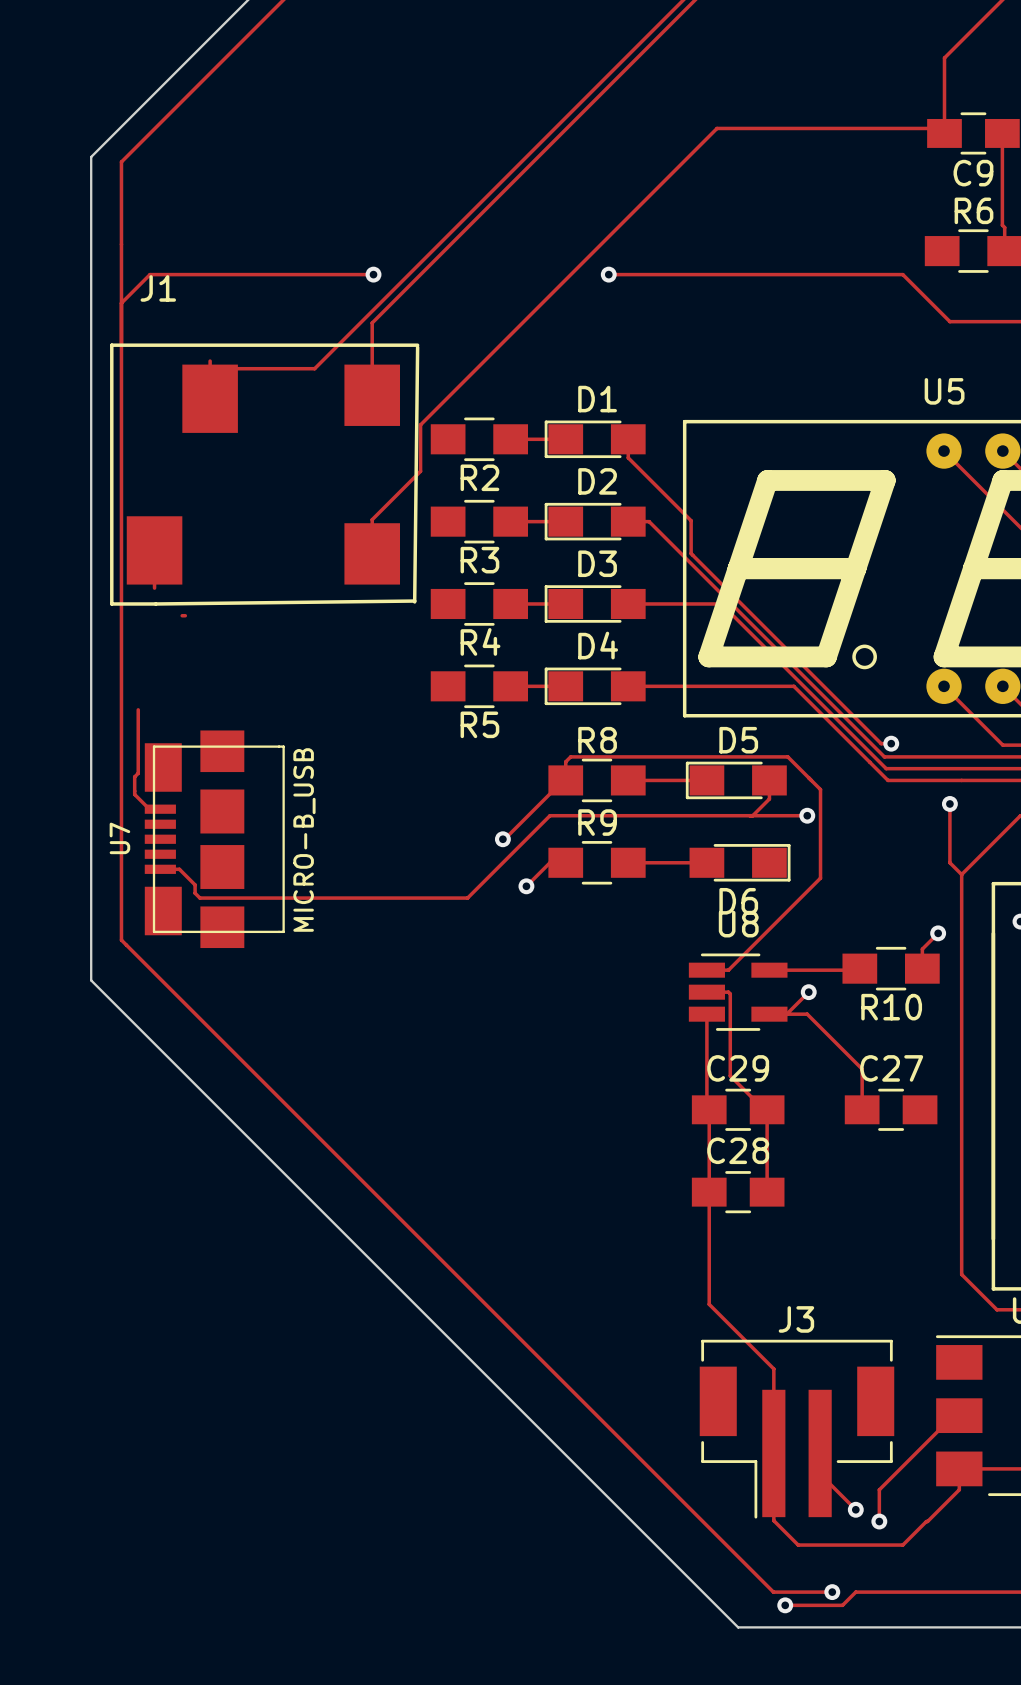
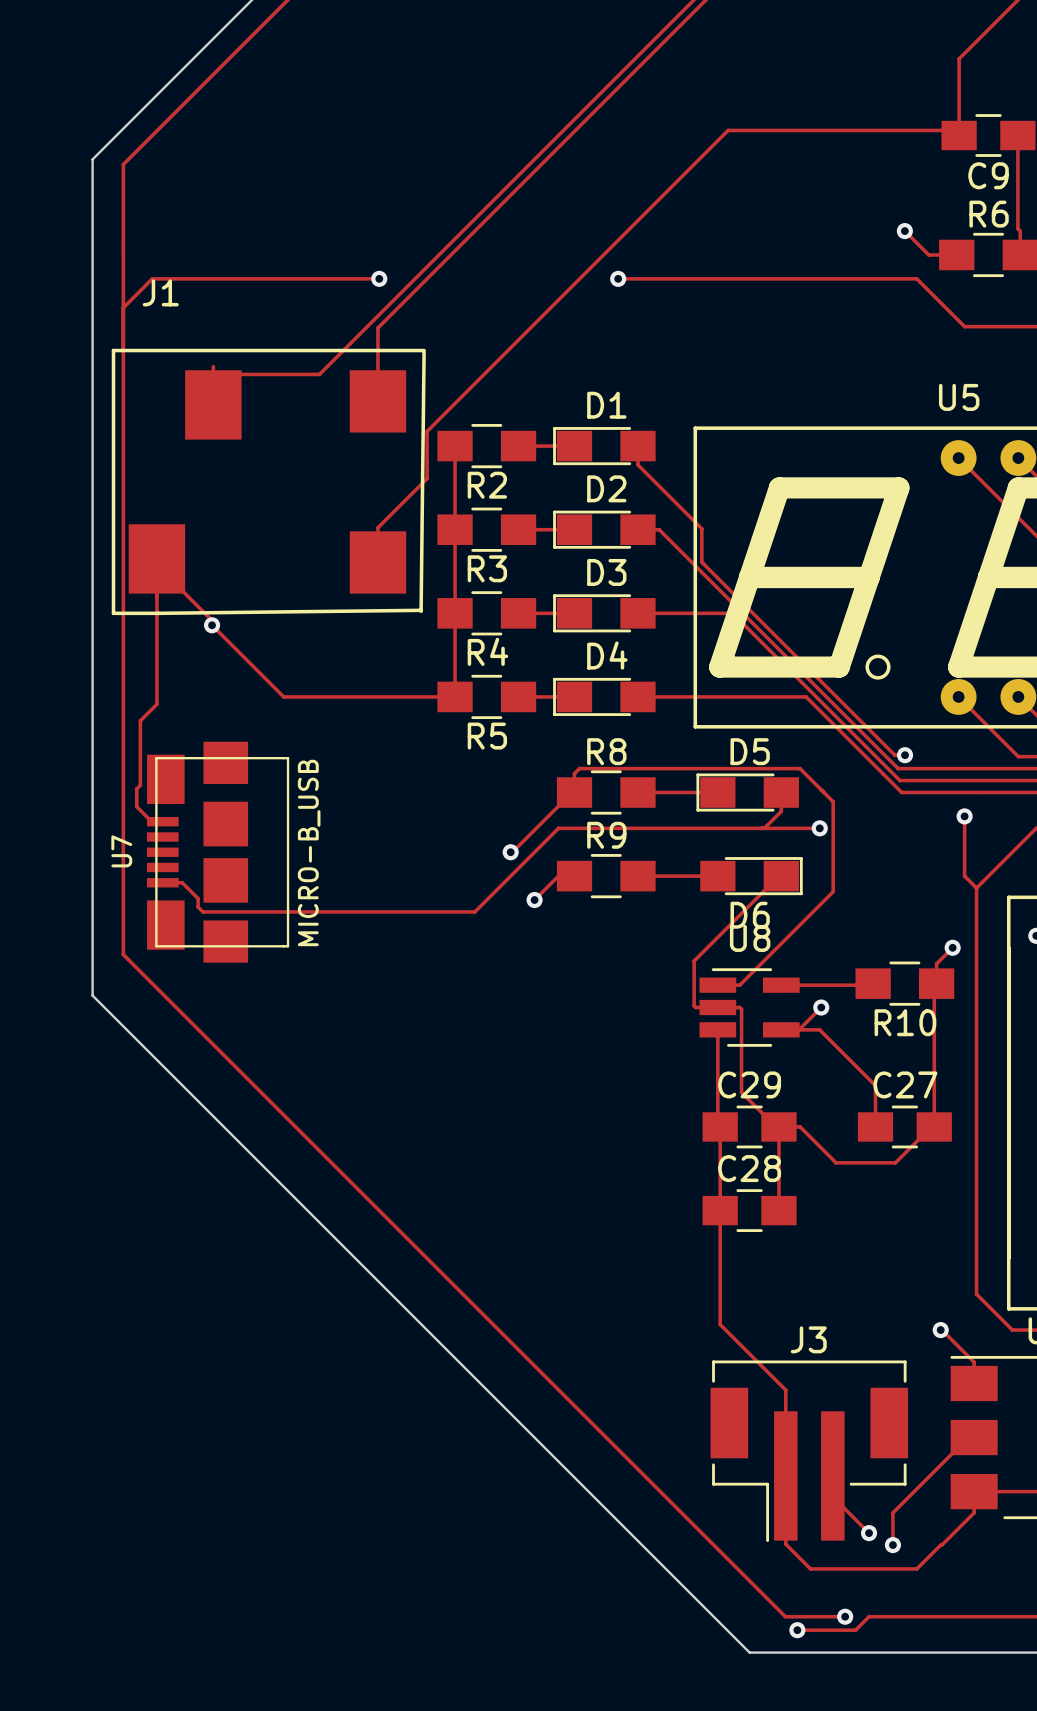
track: none -> (904, 231) (928, 254) (956, 254)
via: none -> (904, 231)
track: none -> (455, 446) (455, 696) (283, 696) (212, 625) (212, 620) (156, 565)
track: none -> (156, 597) (156, 704) (140, 720)
track: (182, 615) (185, 615) -> none
via: none -> (212, 625)
track: none -> (781, 876) (778, 876) (694, 960) (694, 1005) (695, 1007) (717, 1007)
track: none -> (936, 983) (934, 985) (934, 1126) (931, 1126) (895, 1162) (836, 1162) (800, 1126) (778, 1126)
track: none -> (940, 1330) (974, 1362) (974, 1383)
via: none -> (940, 1330)

